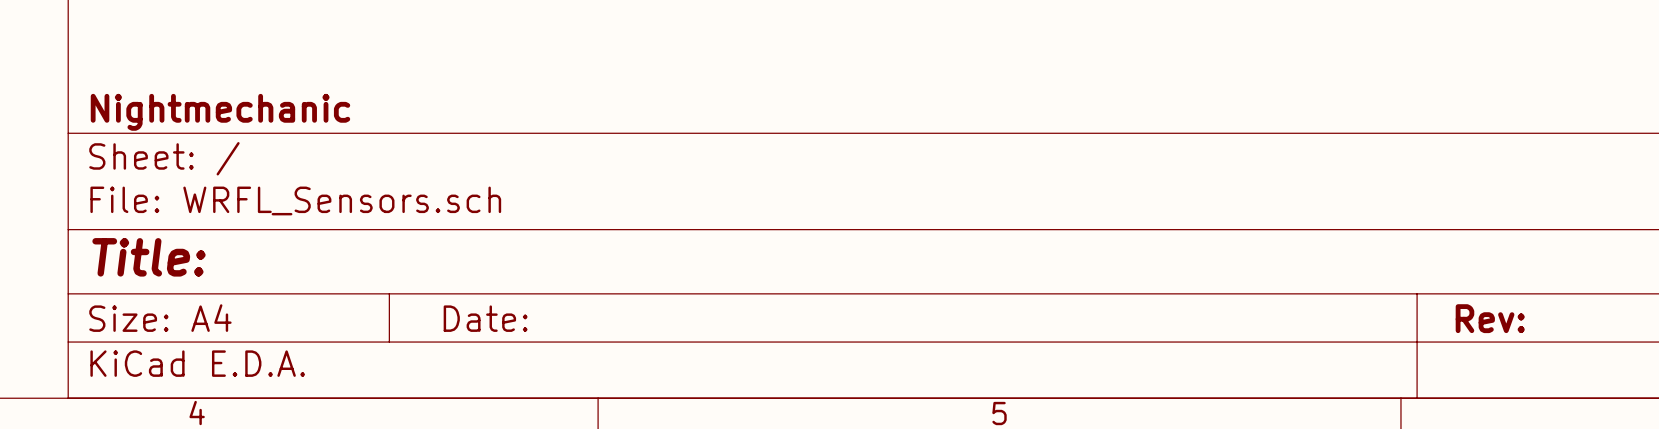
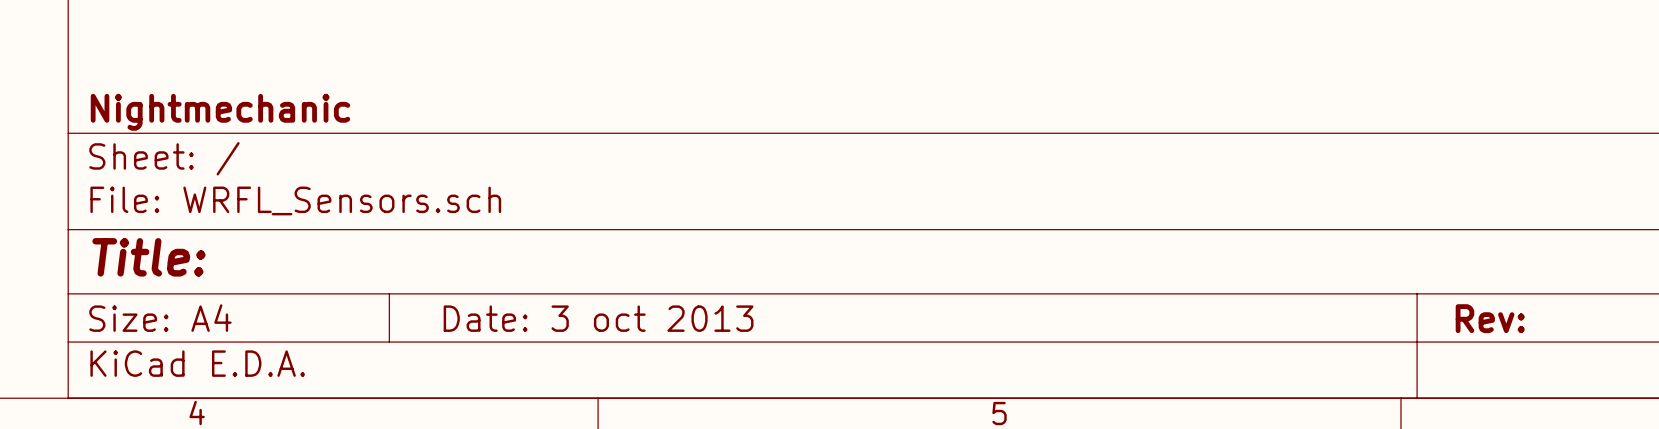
title block: Date: (485, 318) -> Date: 3 oct 2013 (598, 318)

